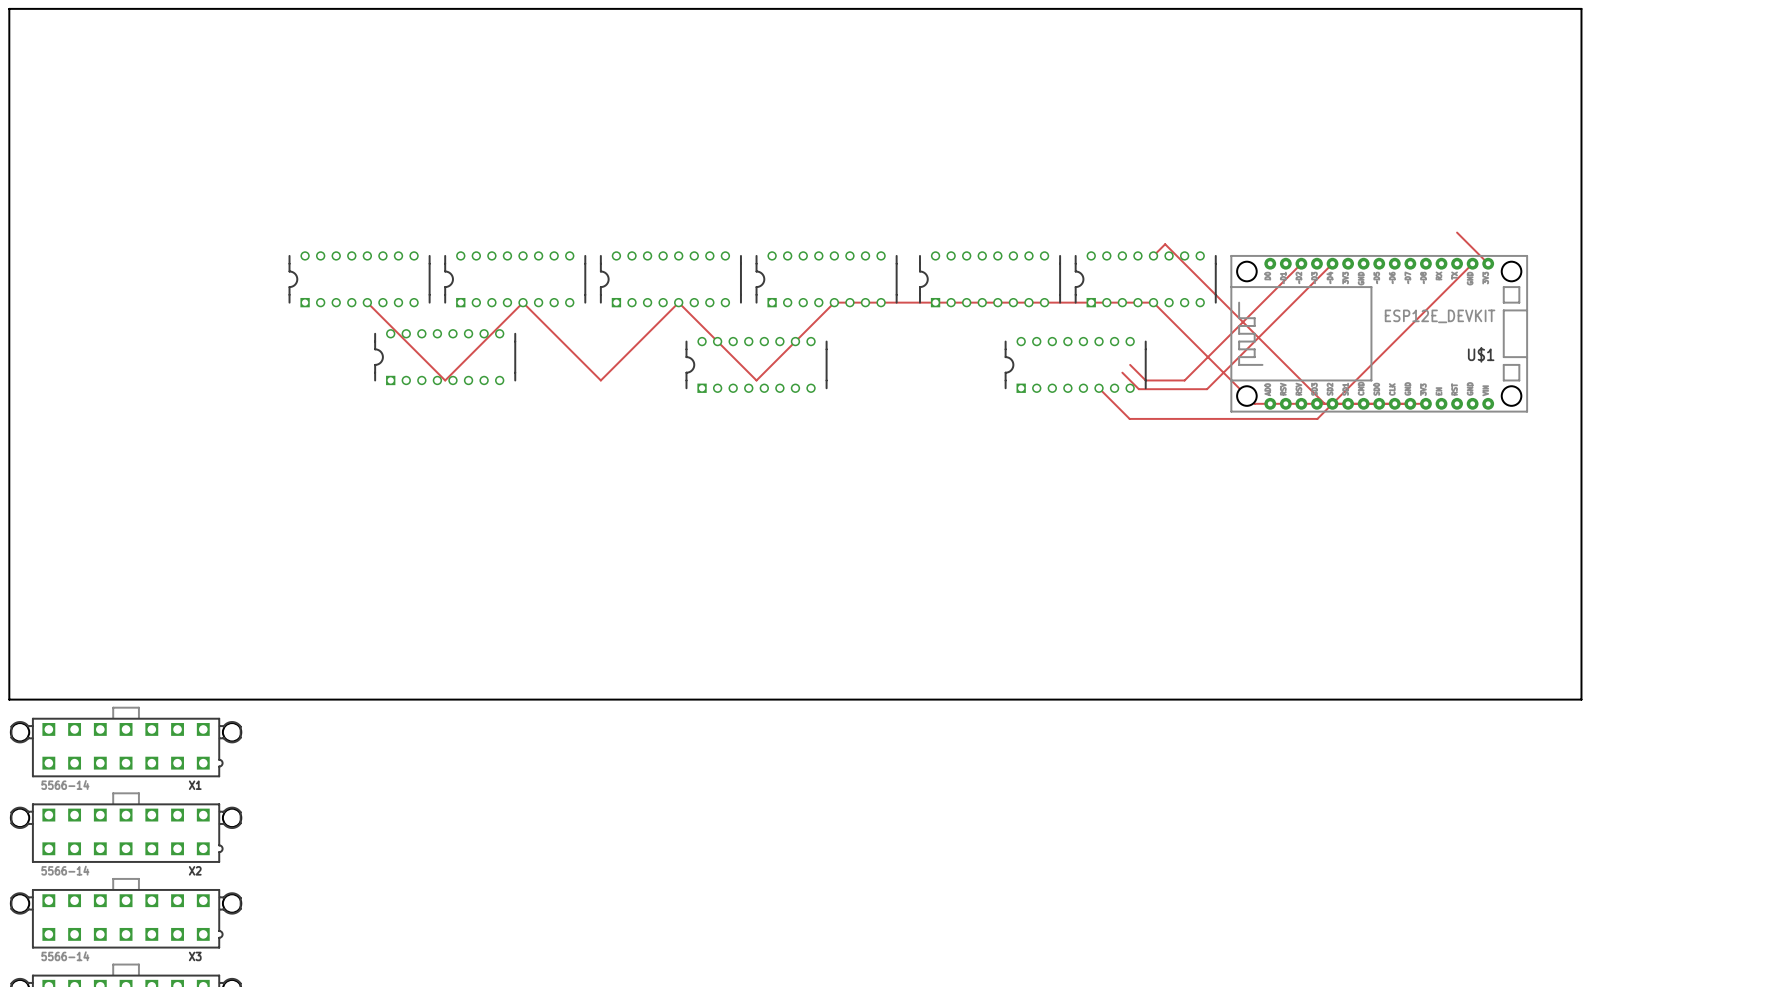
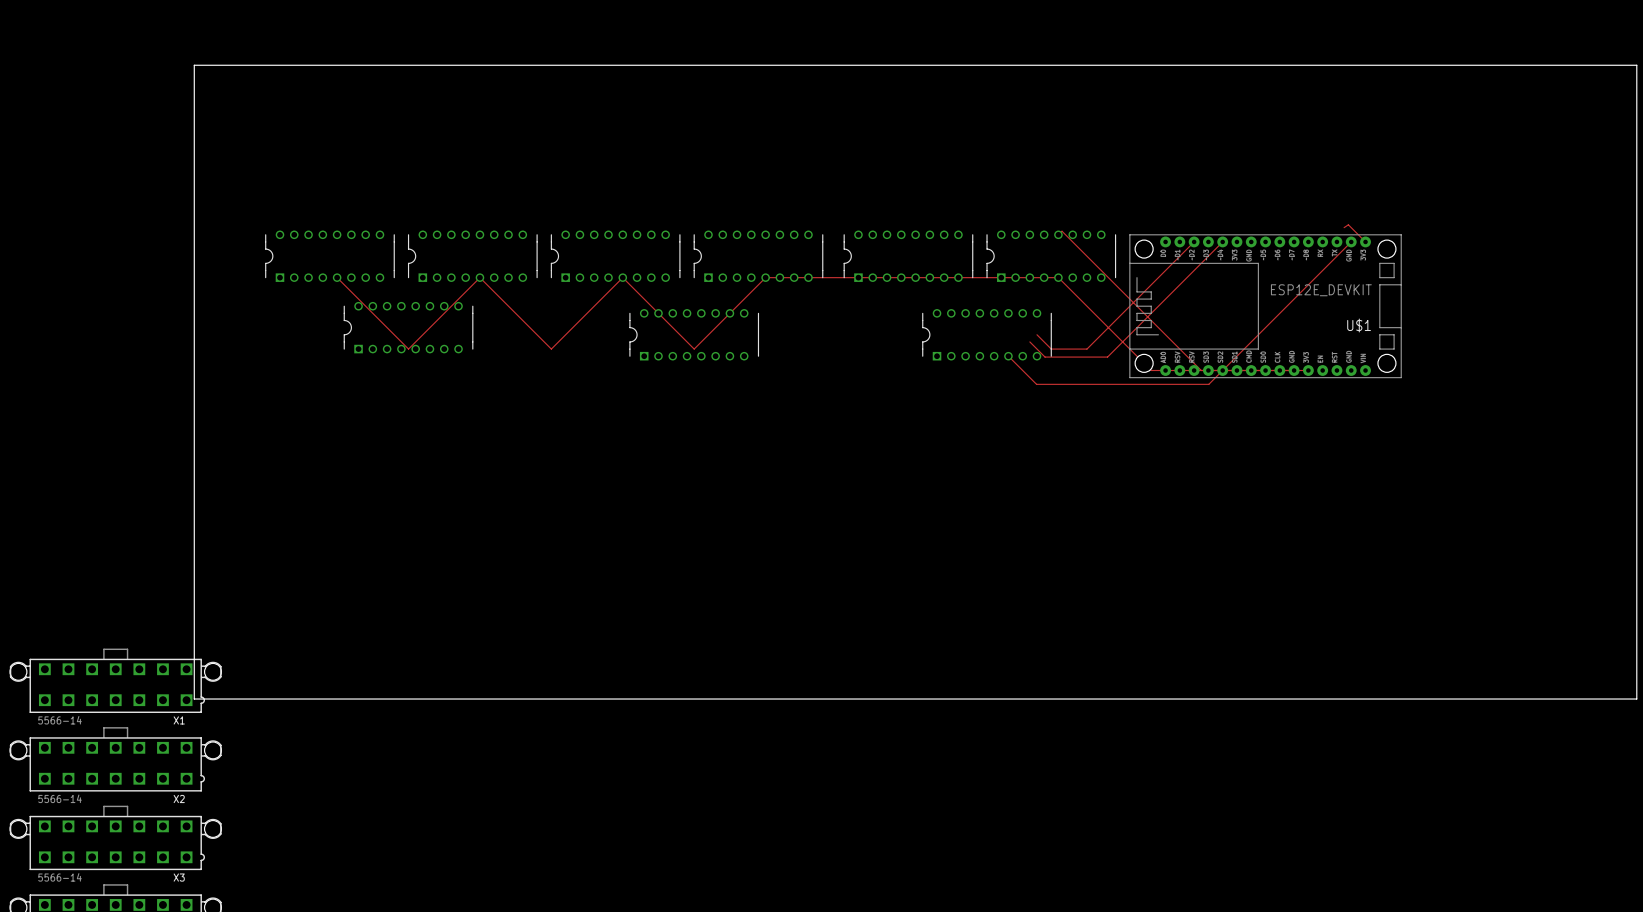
board edge: (9, 8) (1581, 8) (1581, 699) (9, 699) (9, 8) -> (194, 65) (1636, 65) (1636, 699) (194, 699) (194, 65)
track: (1457, 232) (1469, 245) -> (1344, 227) (1348, 224)
track: (1157, 252) (1165, 244) (1324, 403) -> (1062, 231) (1201, 370)

